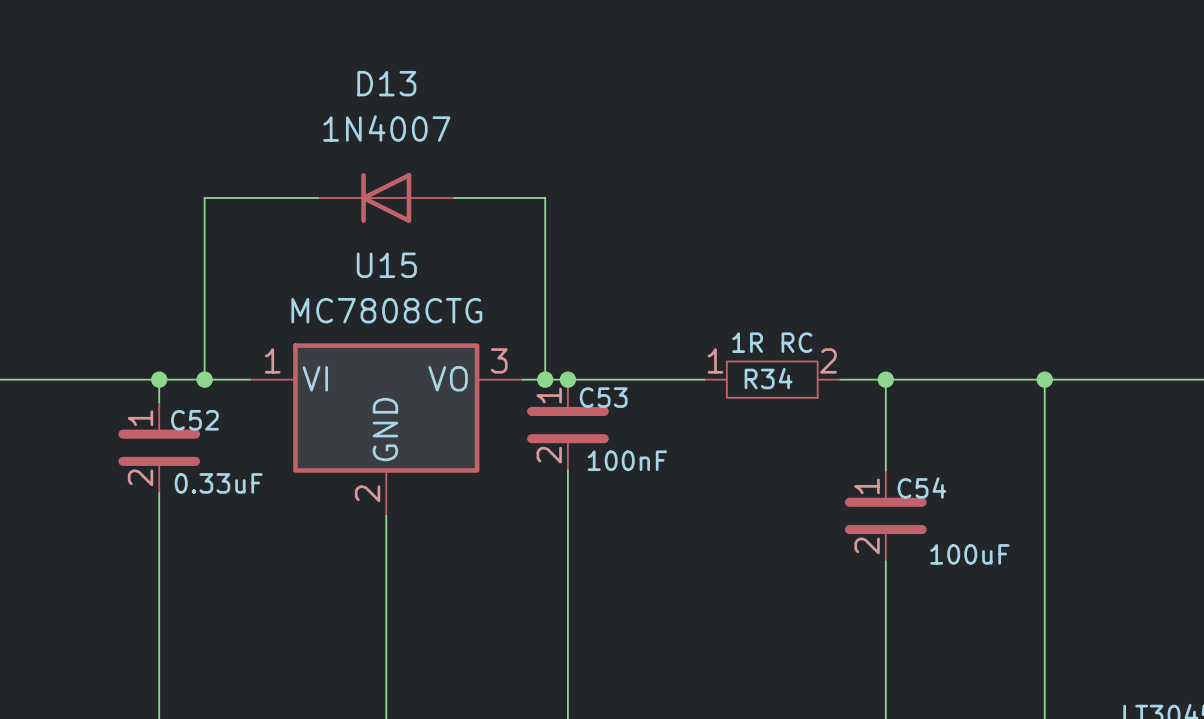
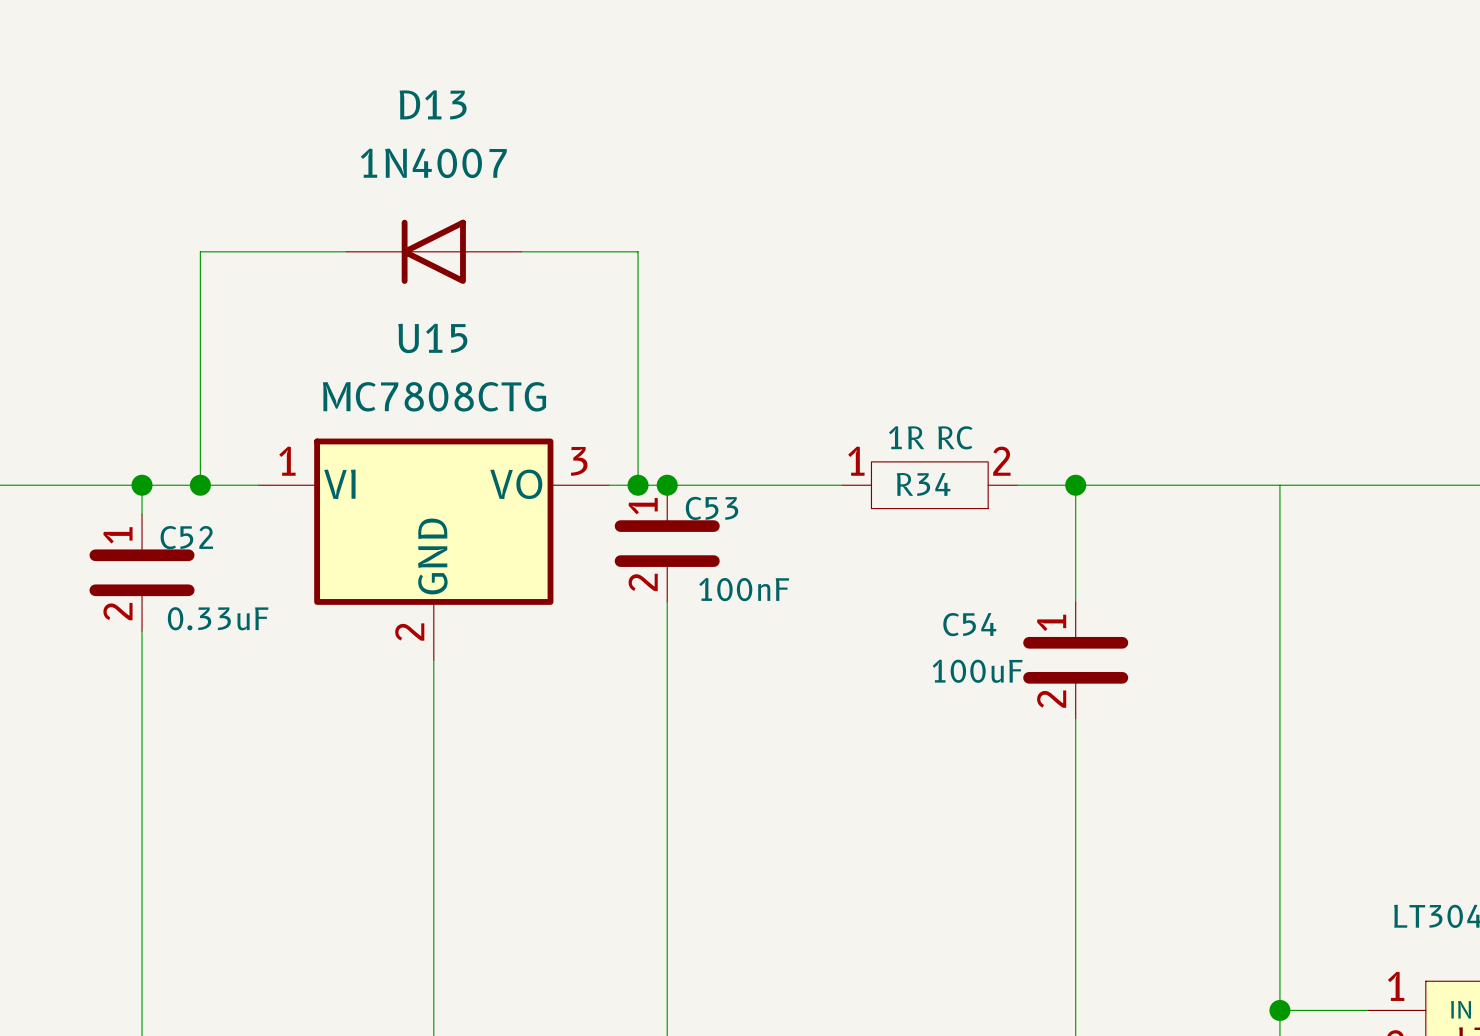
junction: (1044, 379) -> none
C54 name position: C54 (921, 487) -> C54 (969, 624)
C54 value position: 100uF (969, 554) -> 100uF (977, 671)

